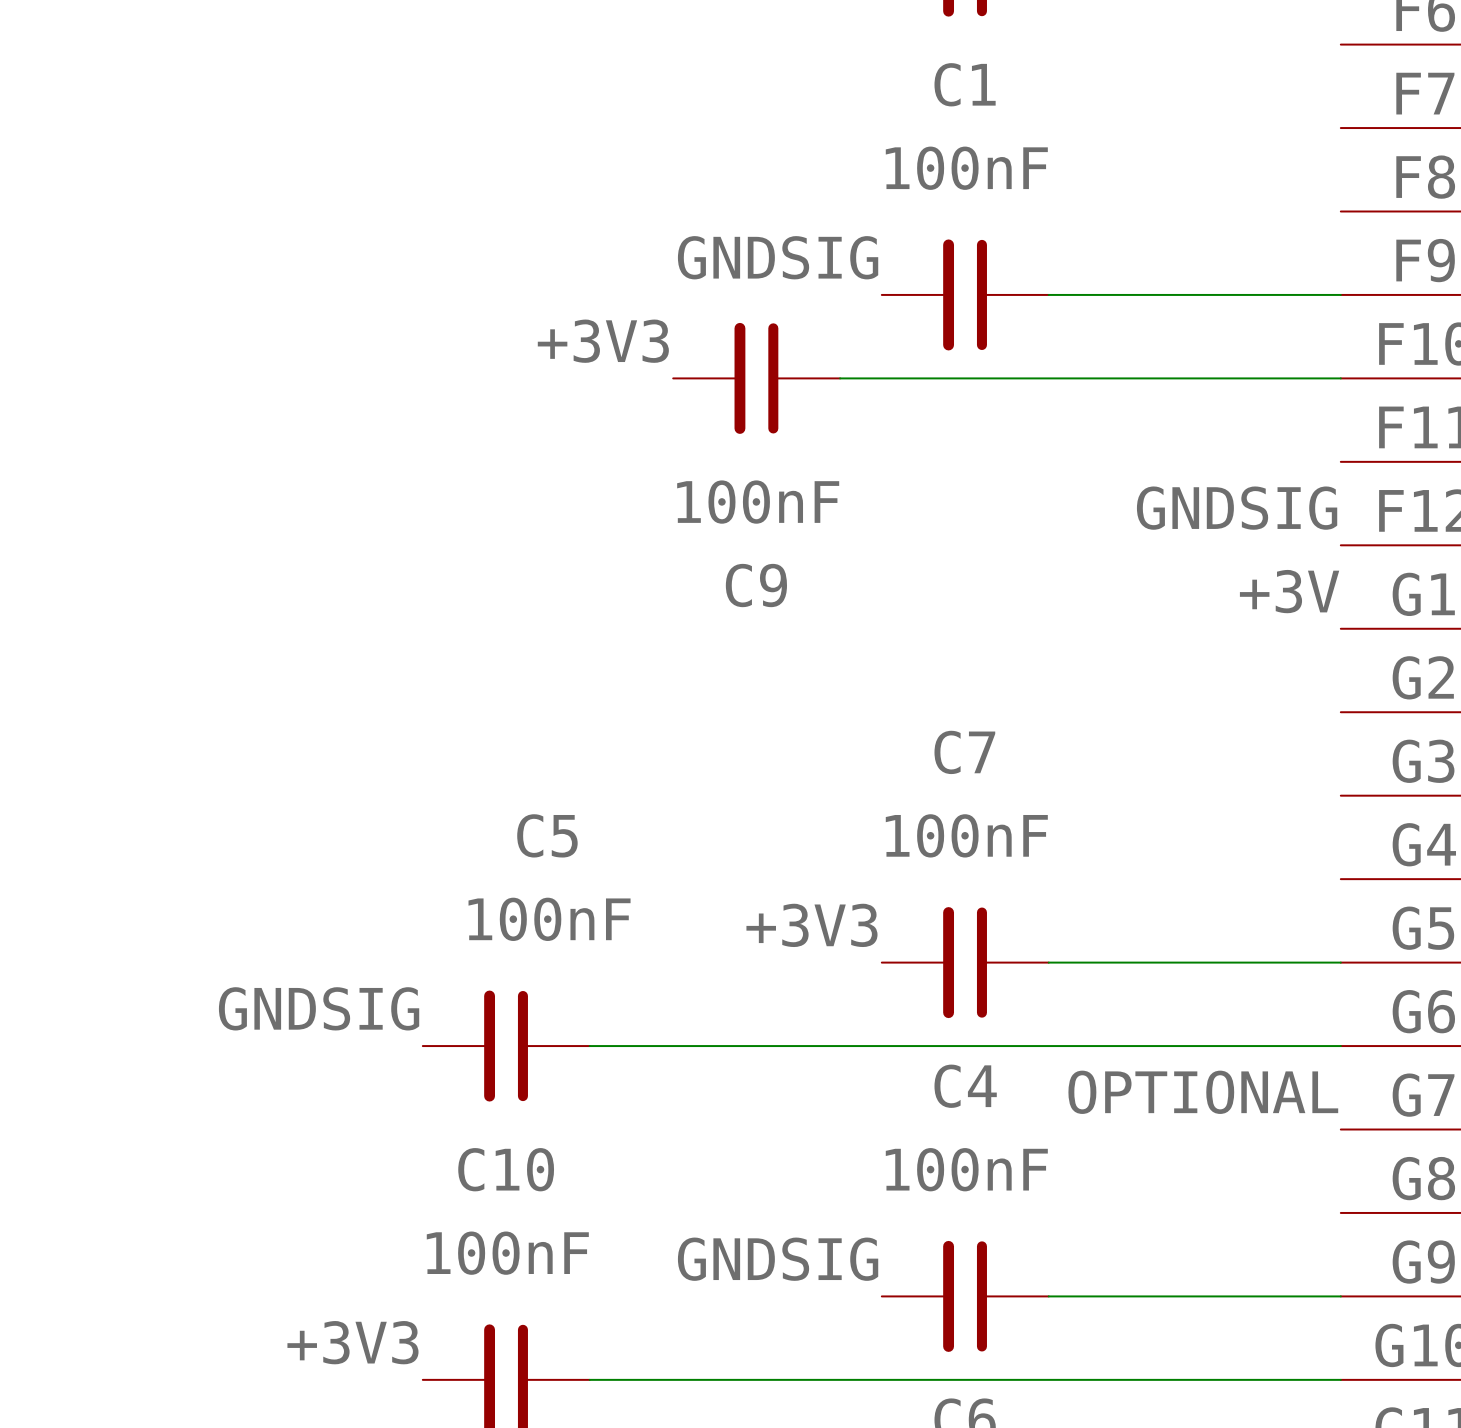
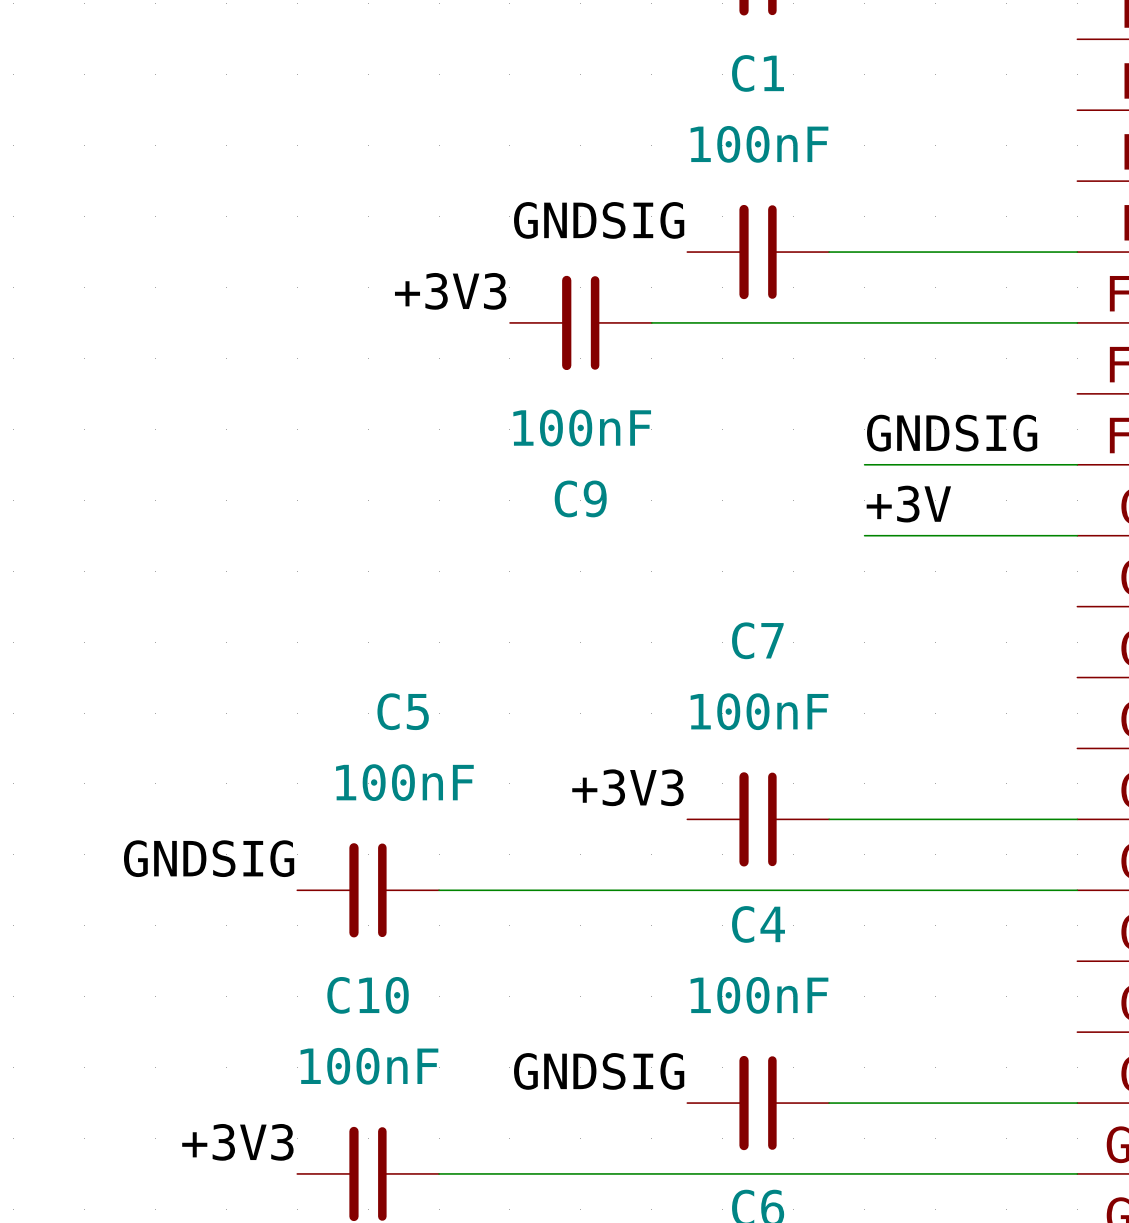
label position: GNDSIG (1237, 508) -> GNDSIG (952, 433)
wire: none -> (864, 464) (1077, 464)
label position: +3V (1289, 591) -> +3V (908, 504)
wire: none -> (864, 535) (1077, 535)
label: OPTIONAL (1203, 1092) -> none

